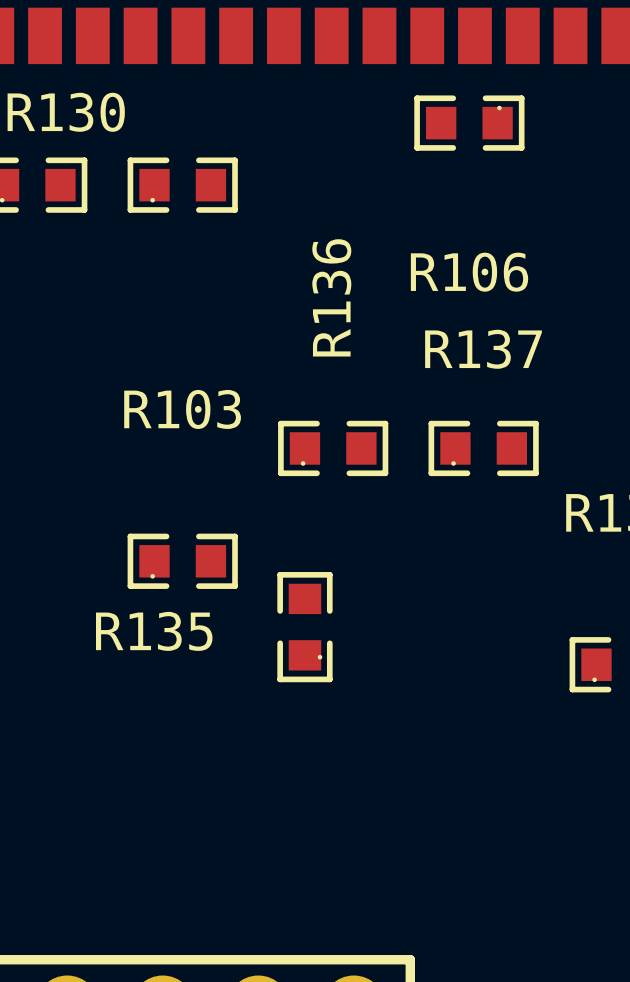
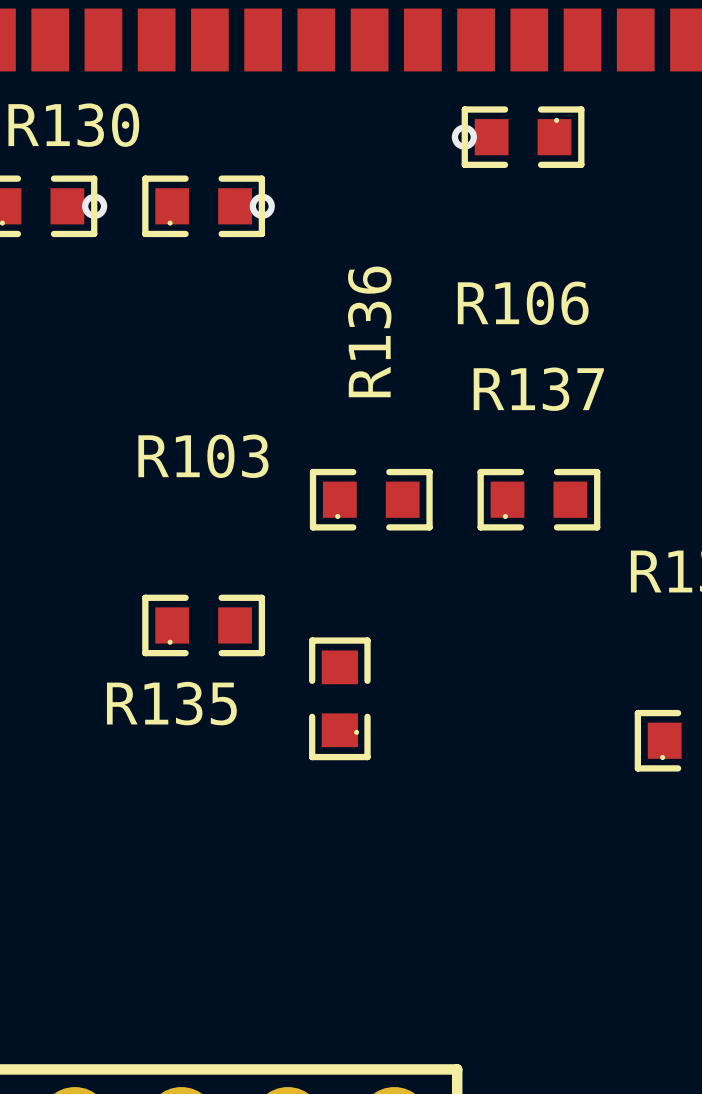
via: none -> (464, 137)
via: none -> (94, 206)
via: none -> (262, 206)

